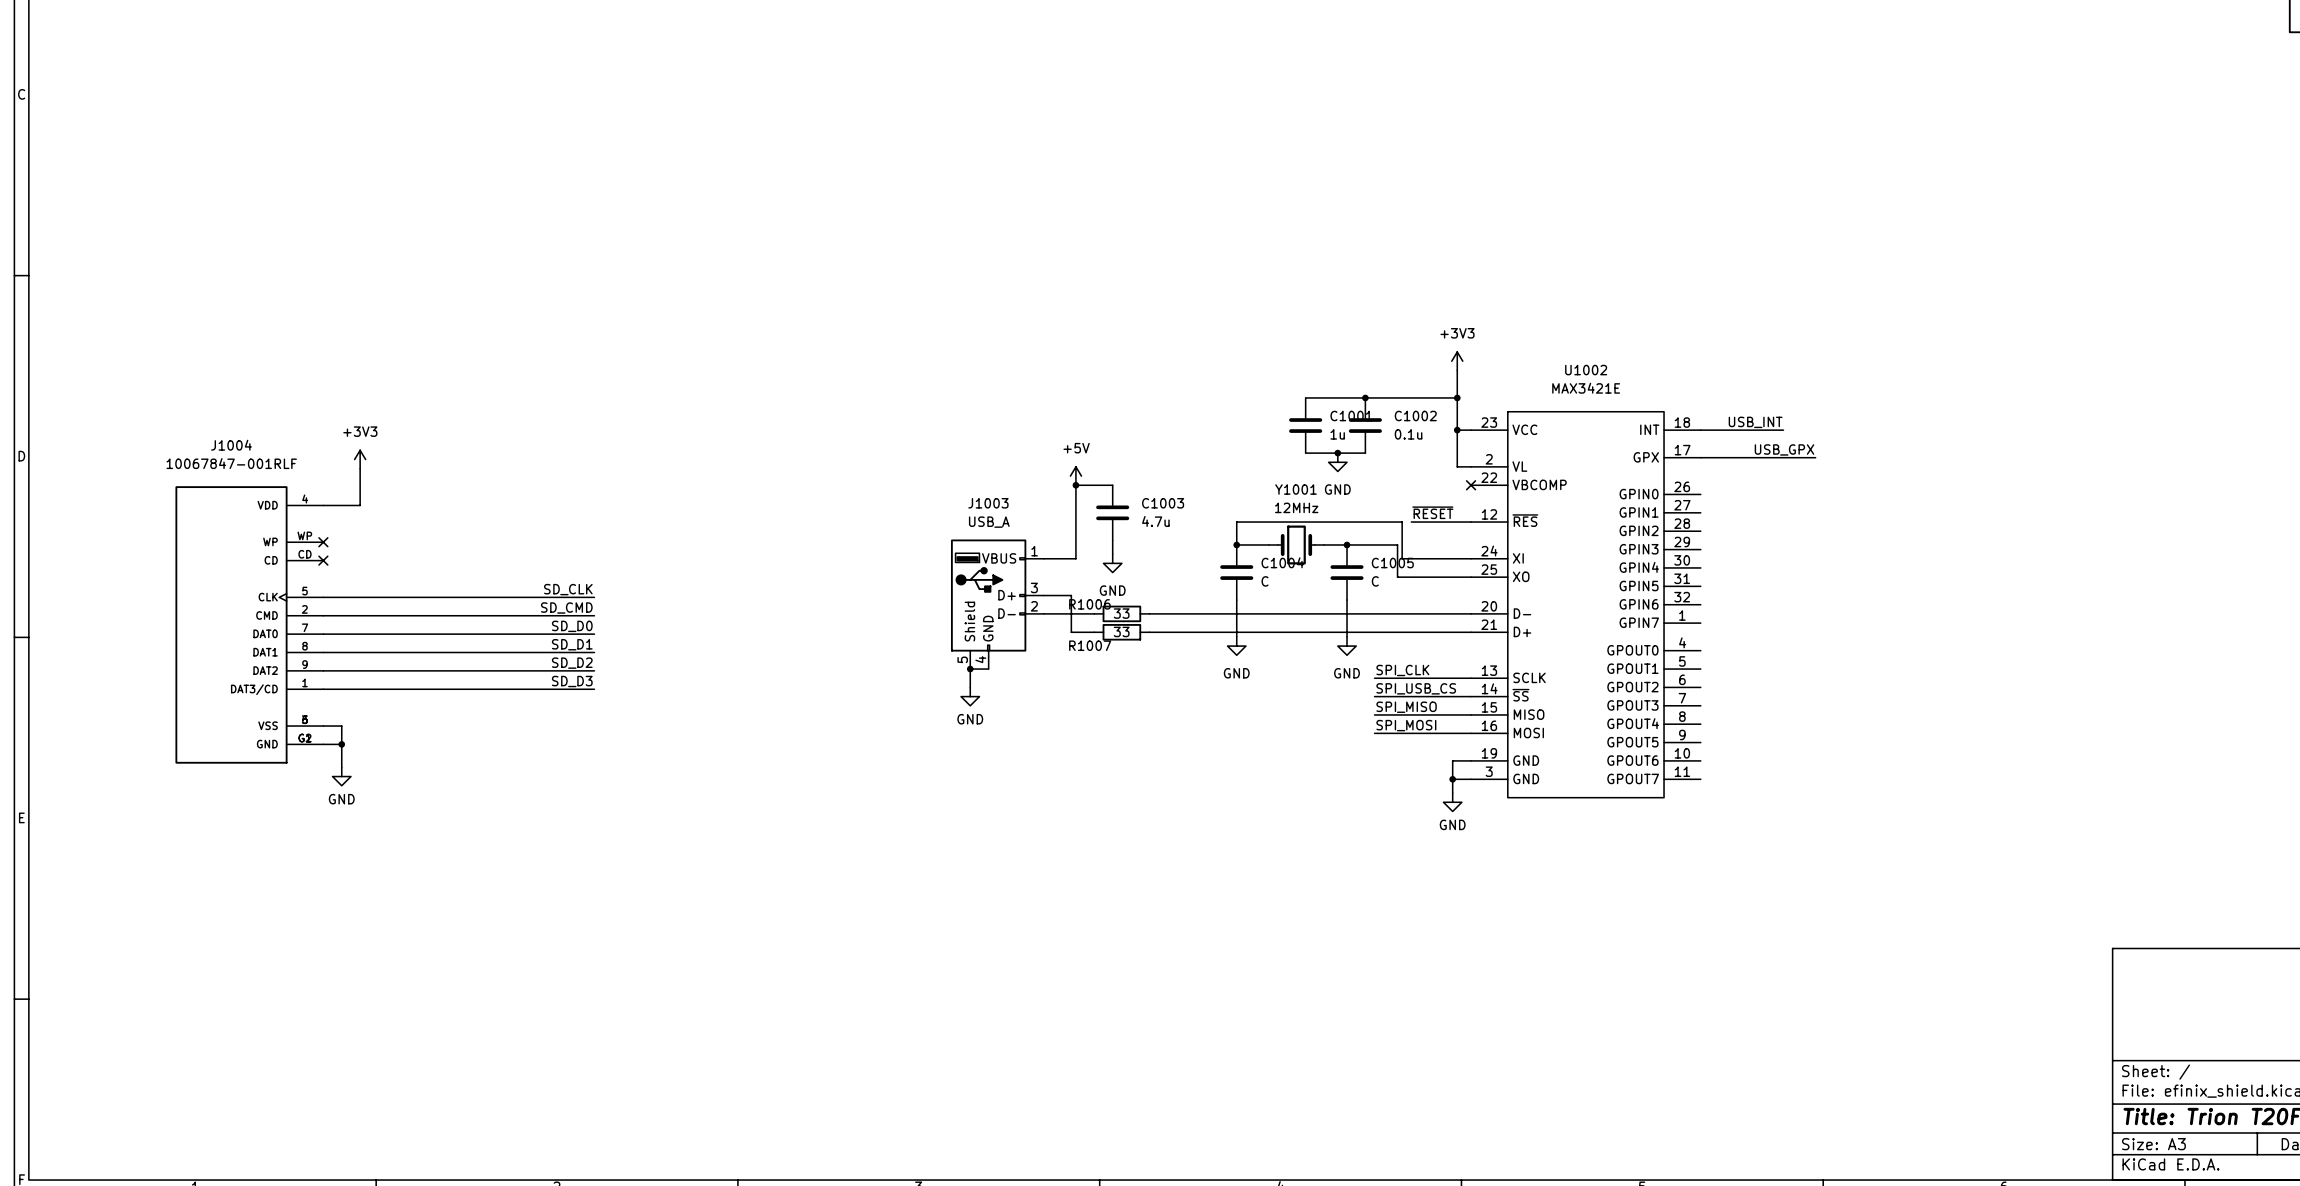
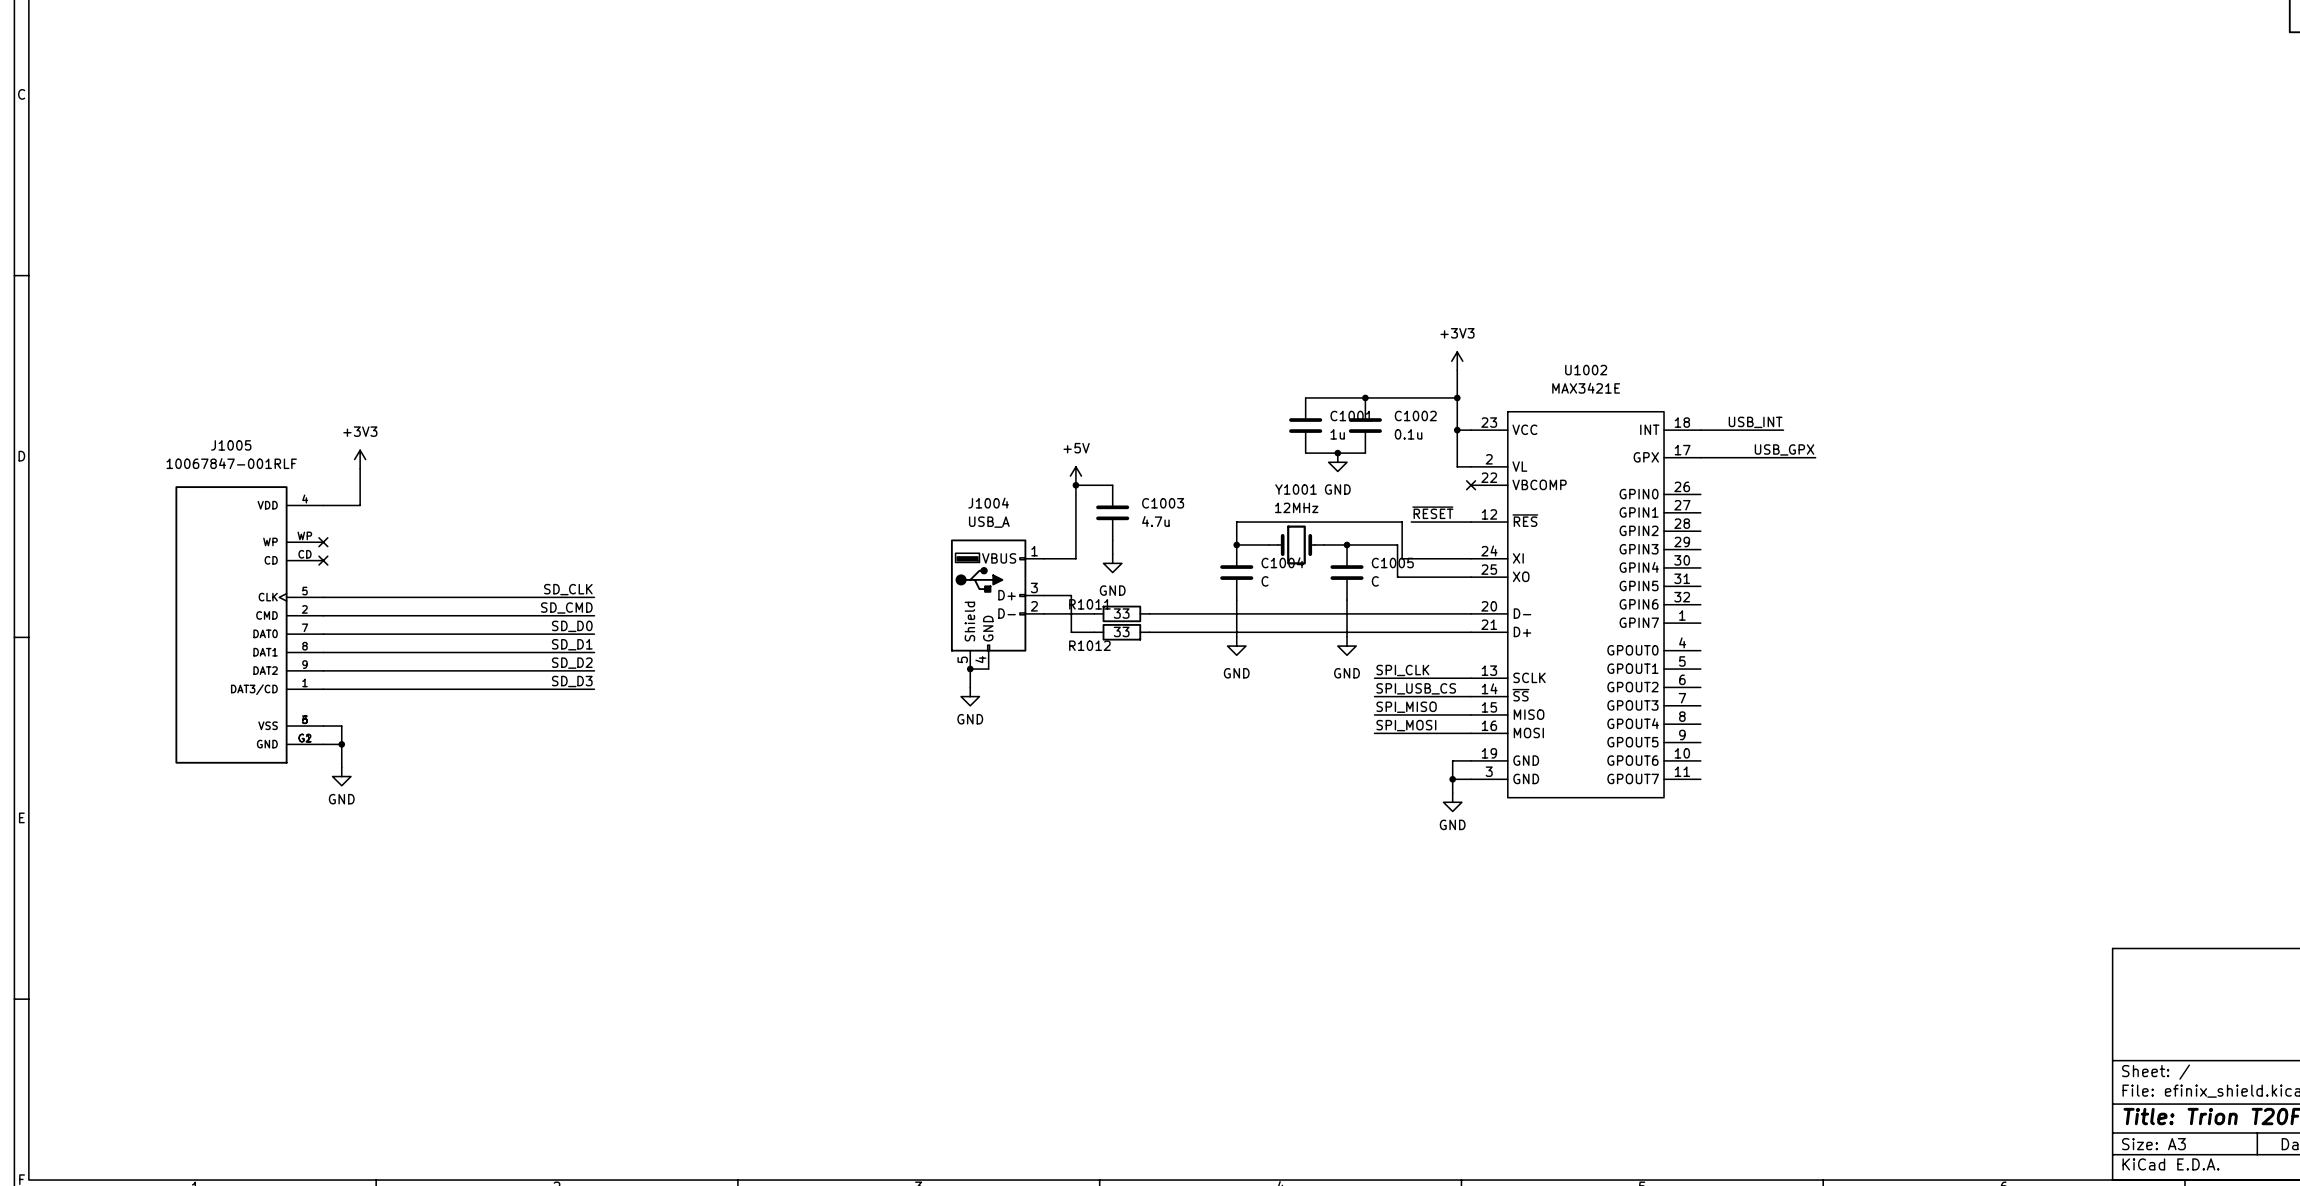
J1004 name: J1004 (231, 445) -> J1005 (231, 445)
J1003 name: J1003 (988, 503) -> J1004 (988, 503)
R1006 name: R1006 (1089, 604) -> R1011 (1089, 604)
R1007 name: R1007 (1090, 645) -> R1012 (1089, 645)

